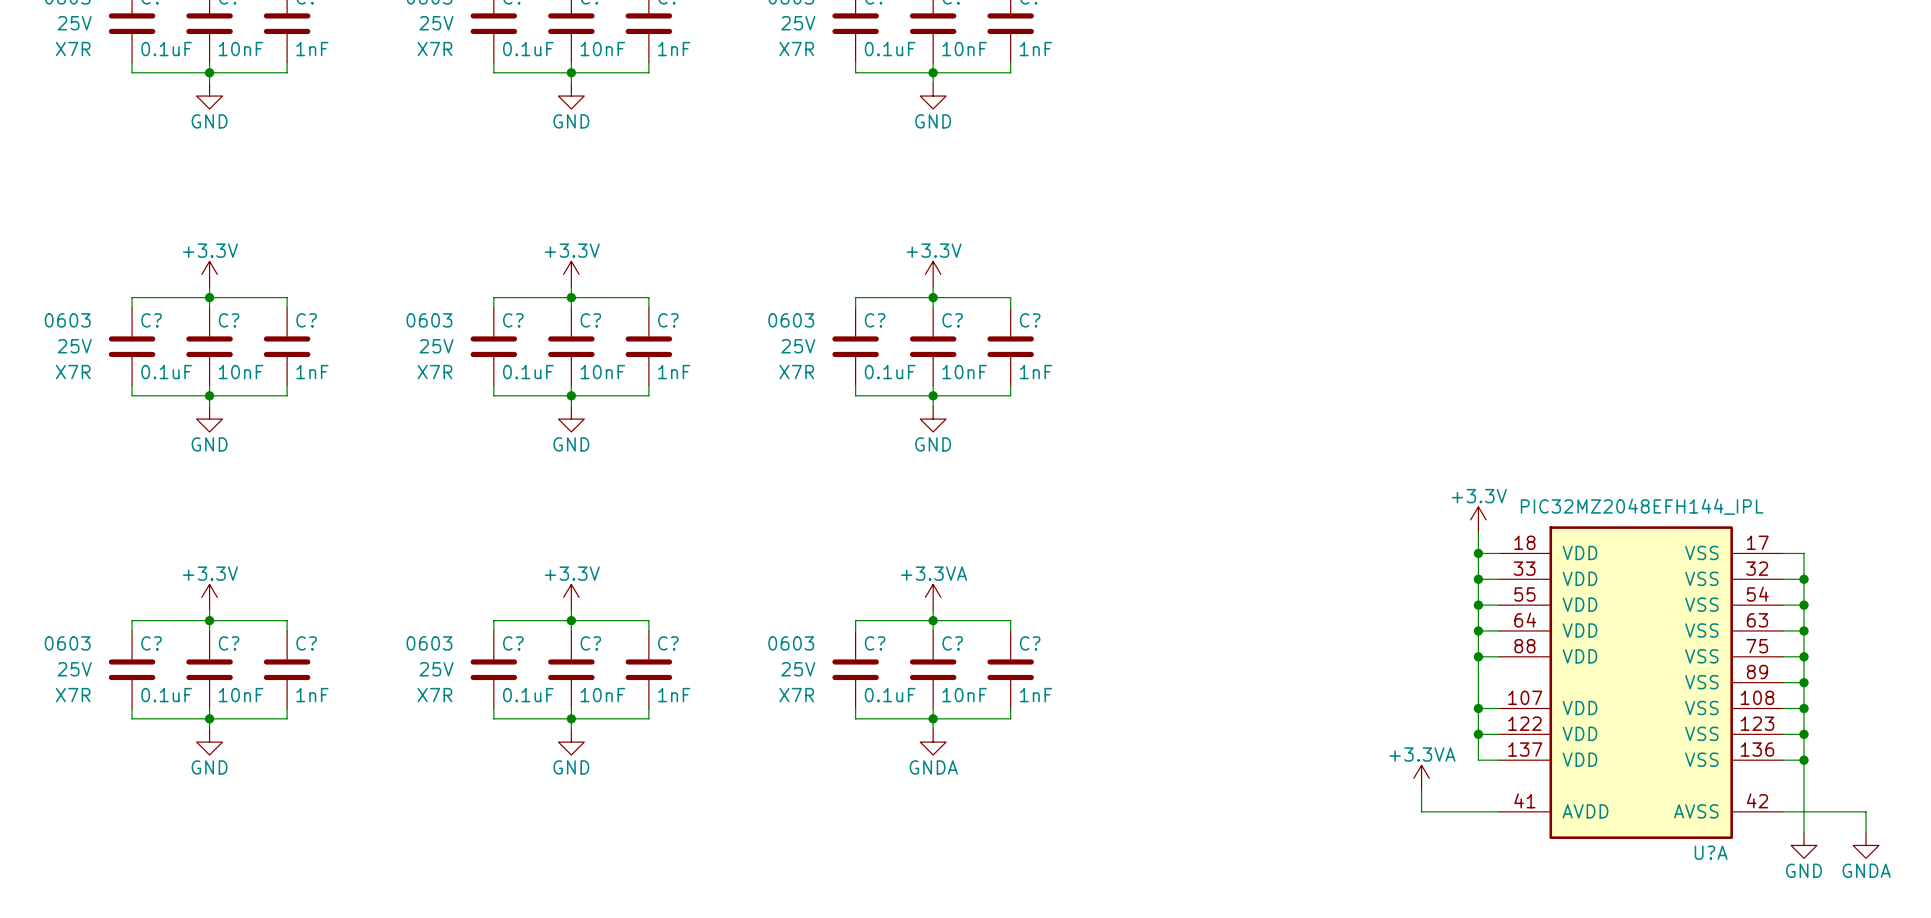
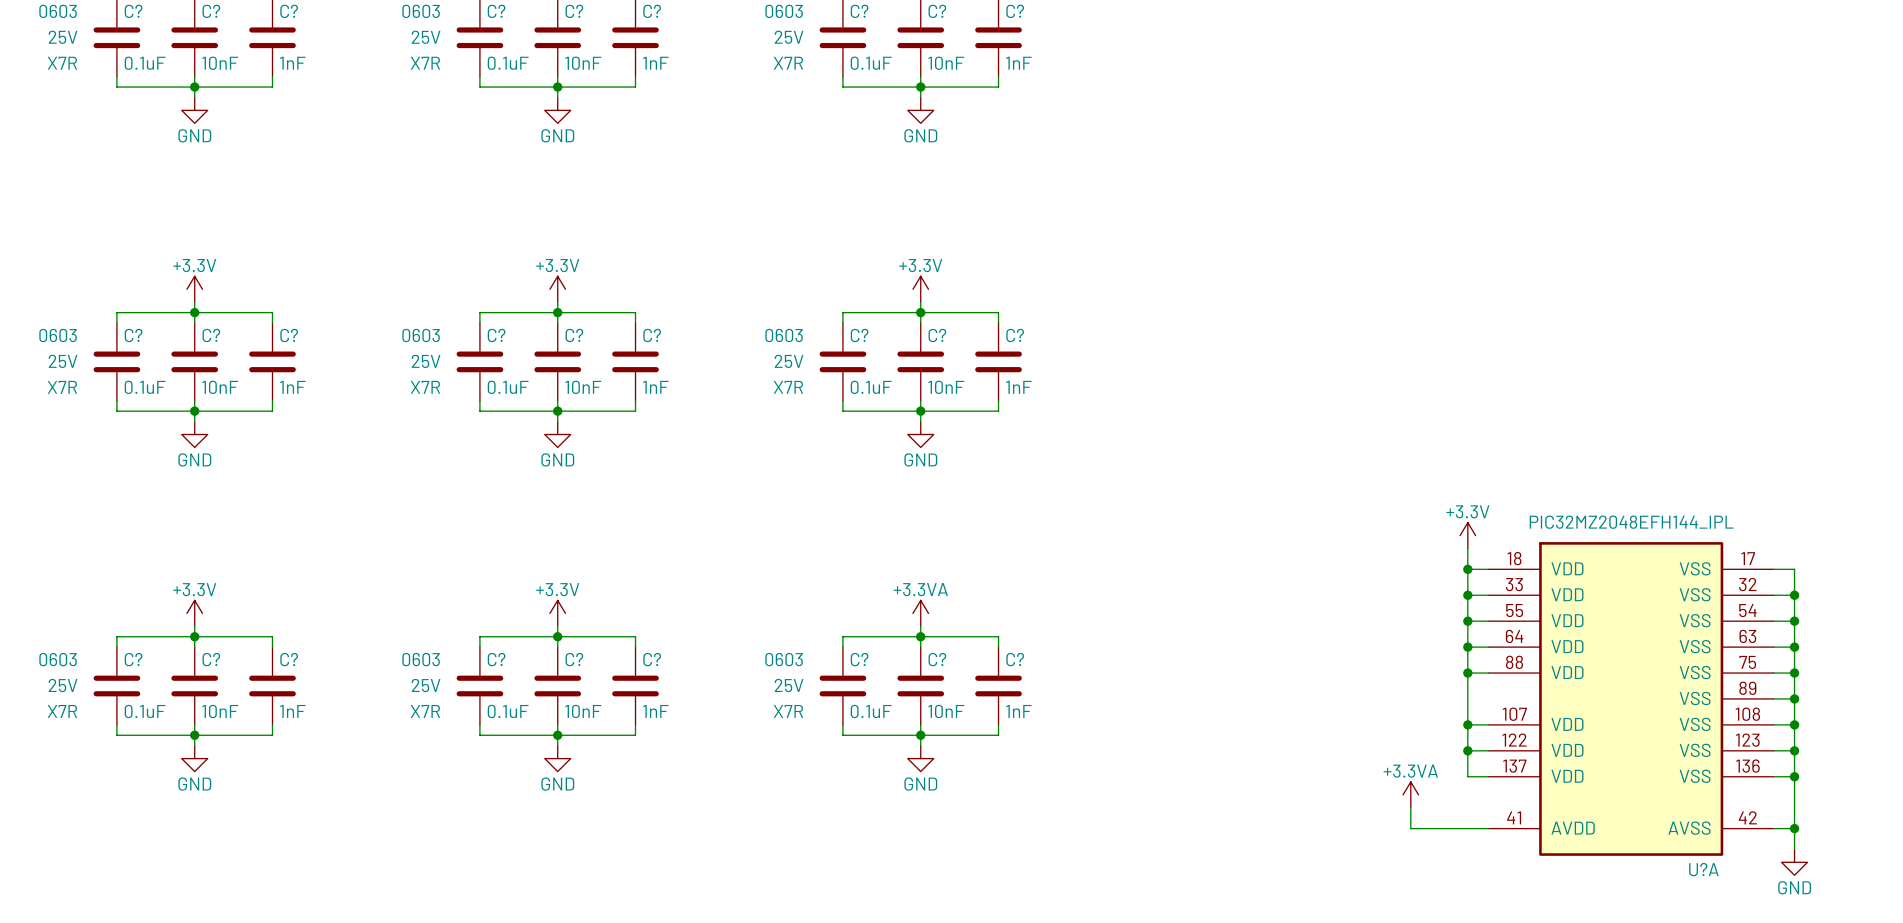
power symbol: GNDA (933, 742) -> GND (920, 758)
wire: (1804, 811) (1866, 811) (1866, 832) -> none
junction: none -> (1794, 828)
power symbol: GNDA (1866, 845) -> none

